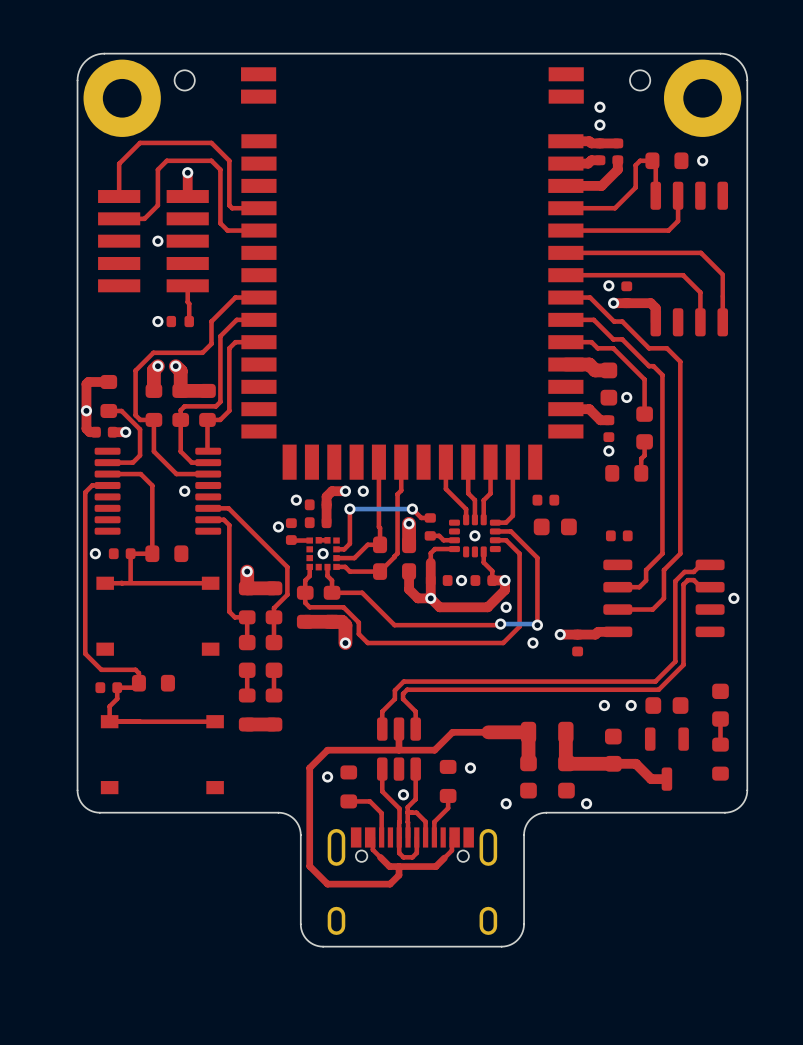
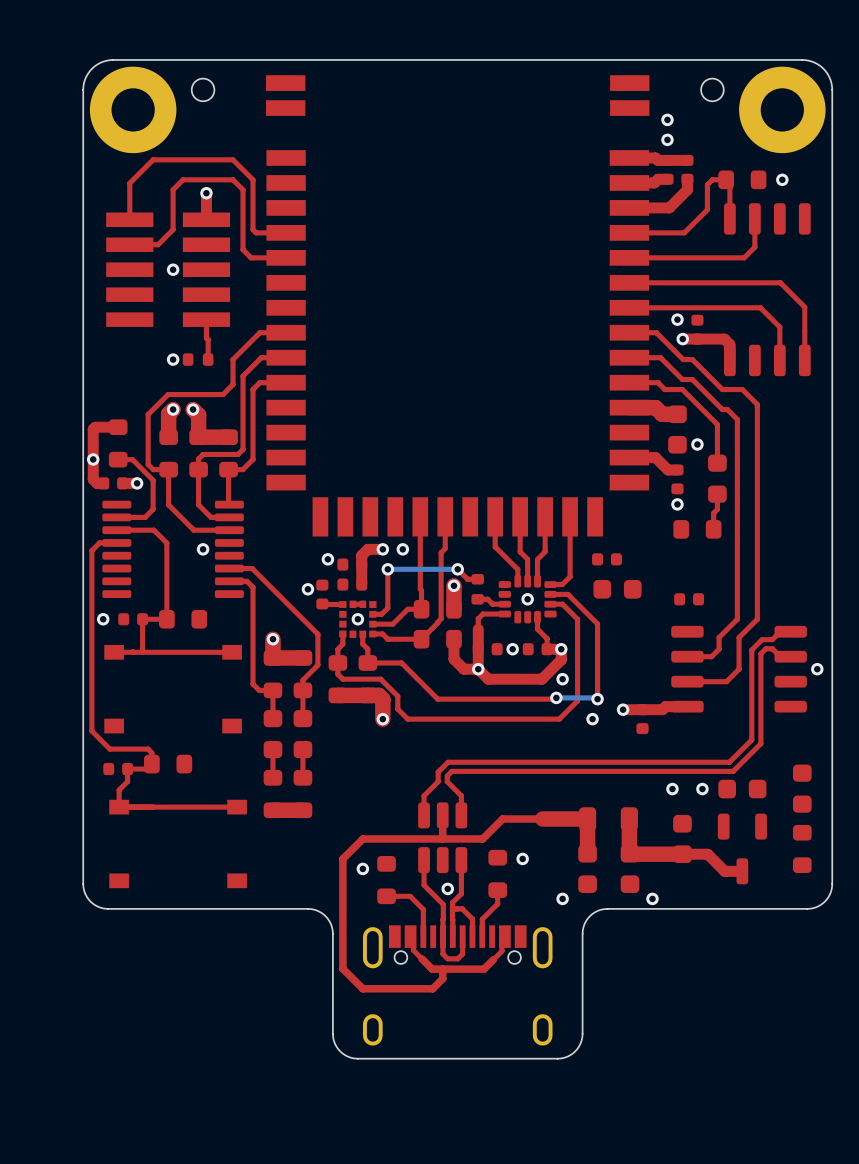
top track: (720, 719) (720, 744) -> none

